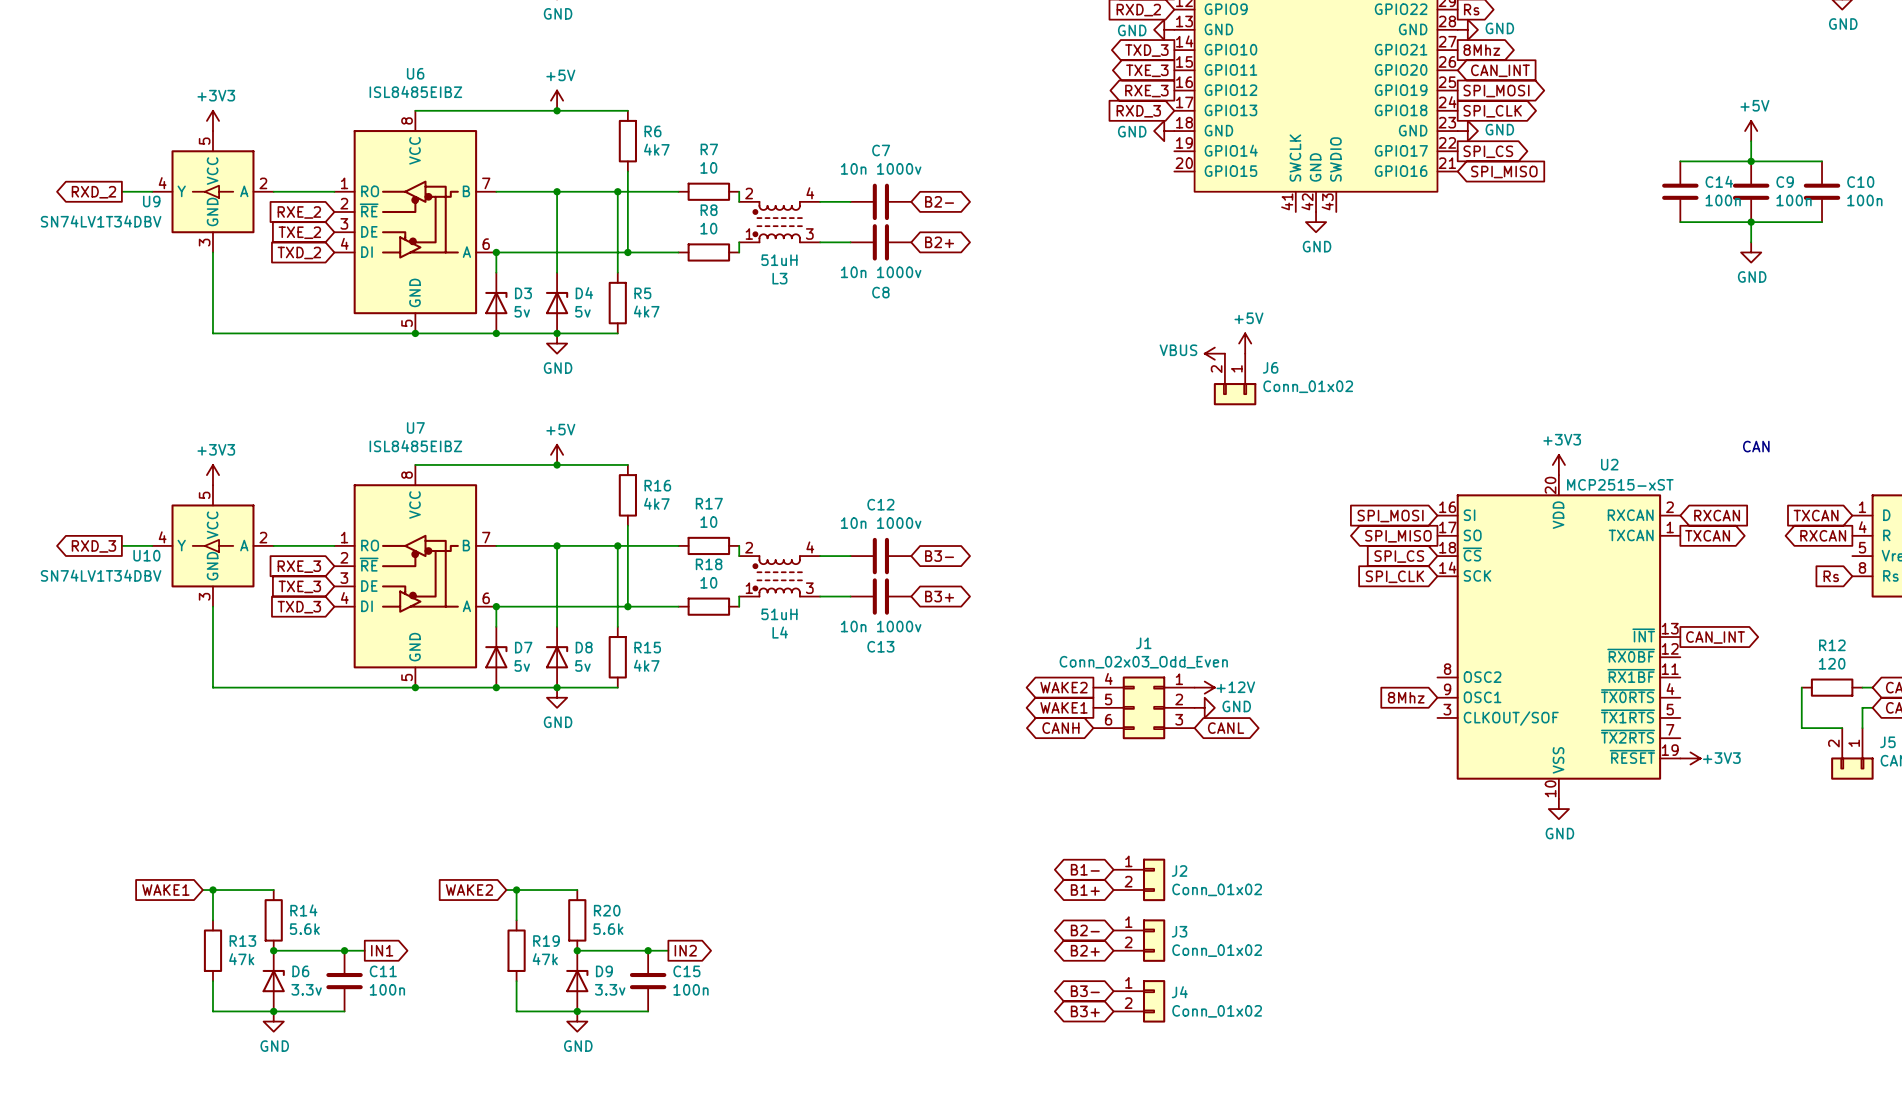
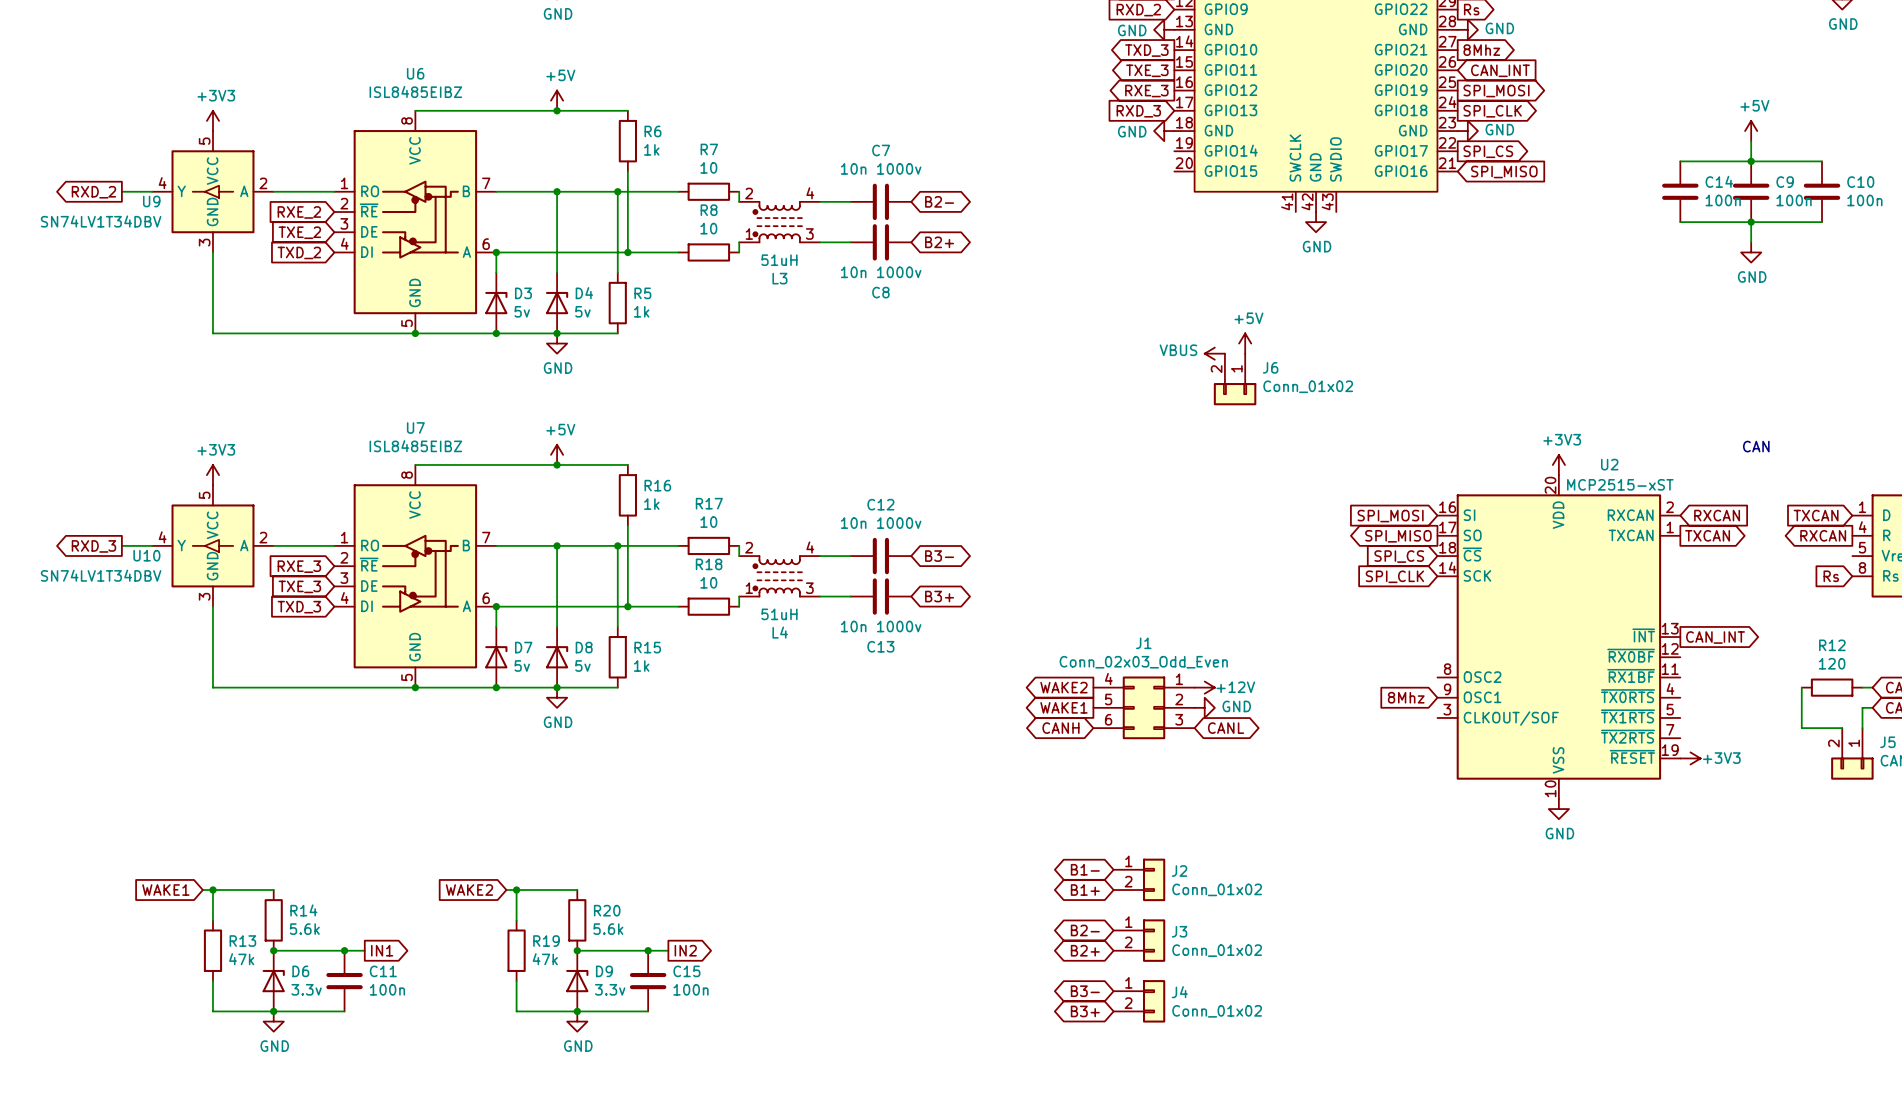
R6 value: 4k7 (656, 149) -> 1k (651, 149)
R5 value: 4k7 (646, 311) -> 1k (641, 311)
R16 value: 4k7 (656, 503) -> 1k (651, 504)
R15 value: 4k7 (646, 665) -> 1k (641, 665)

